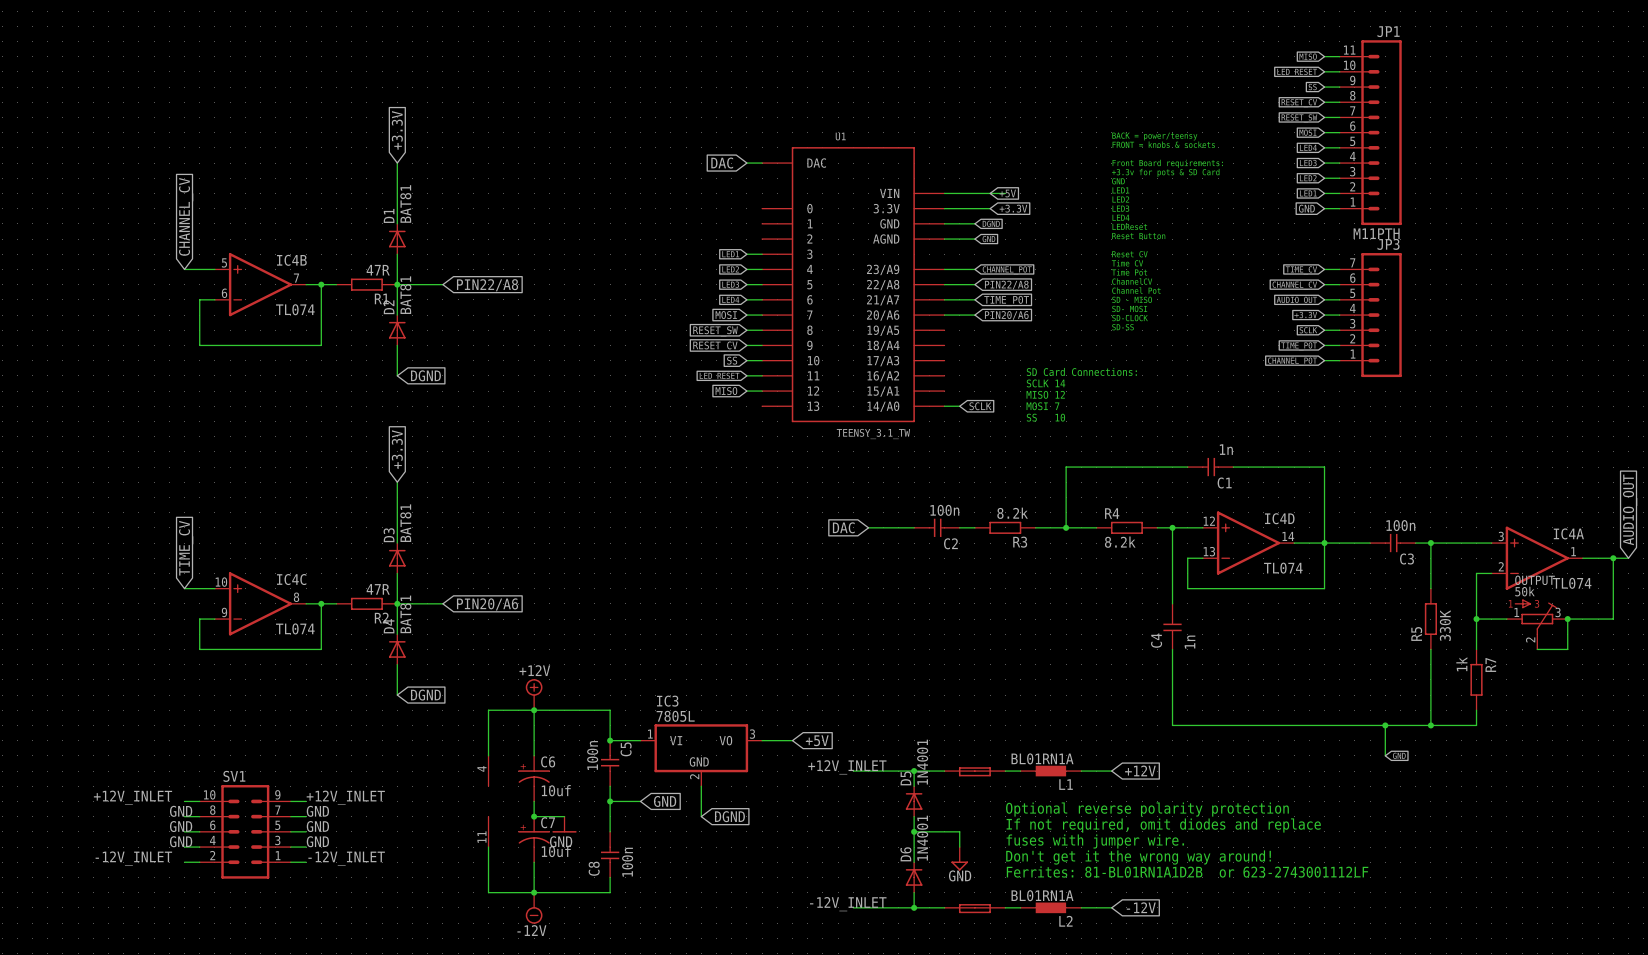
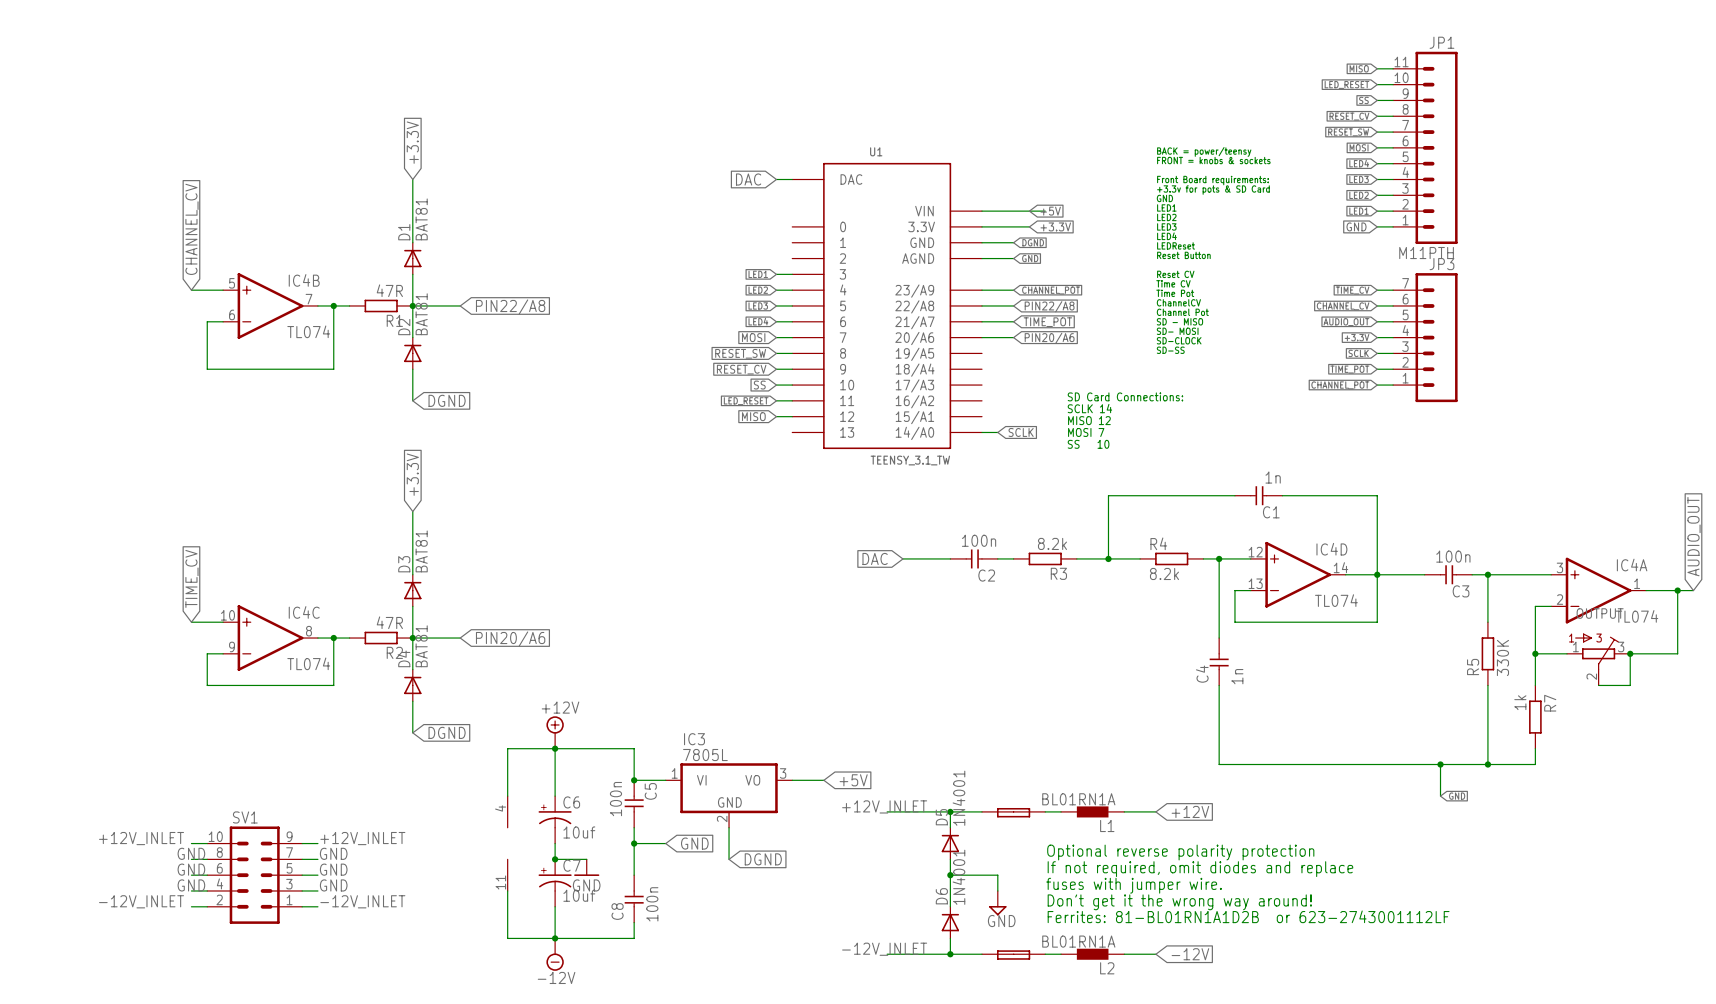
OUTPUT value: 50k (1524, 591) -> none

